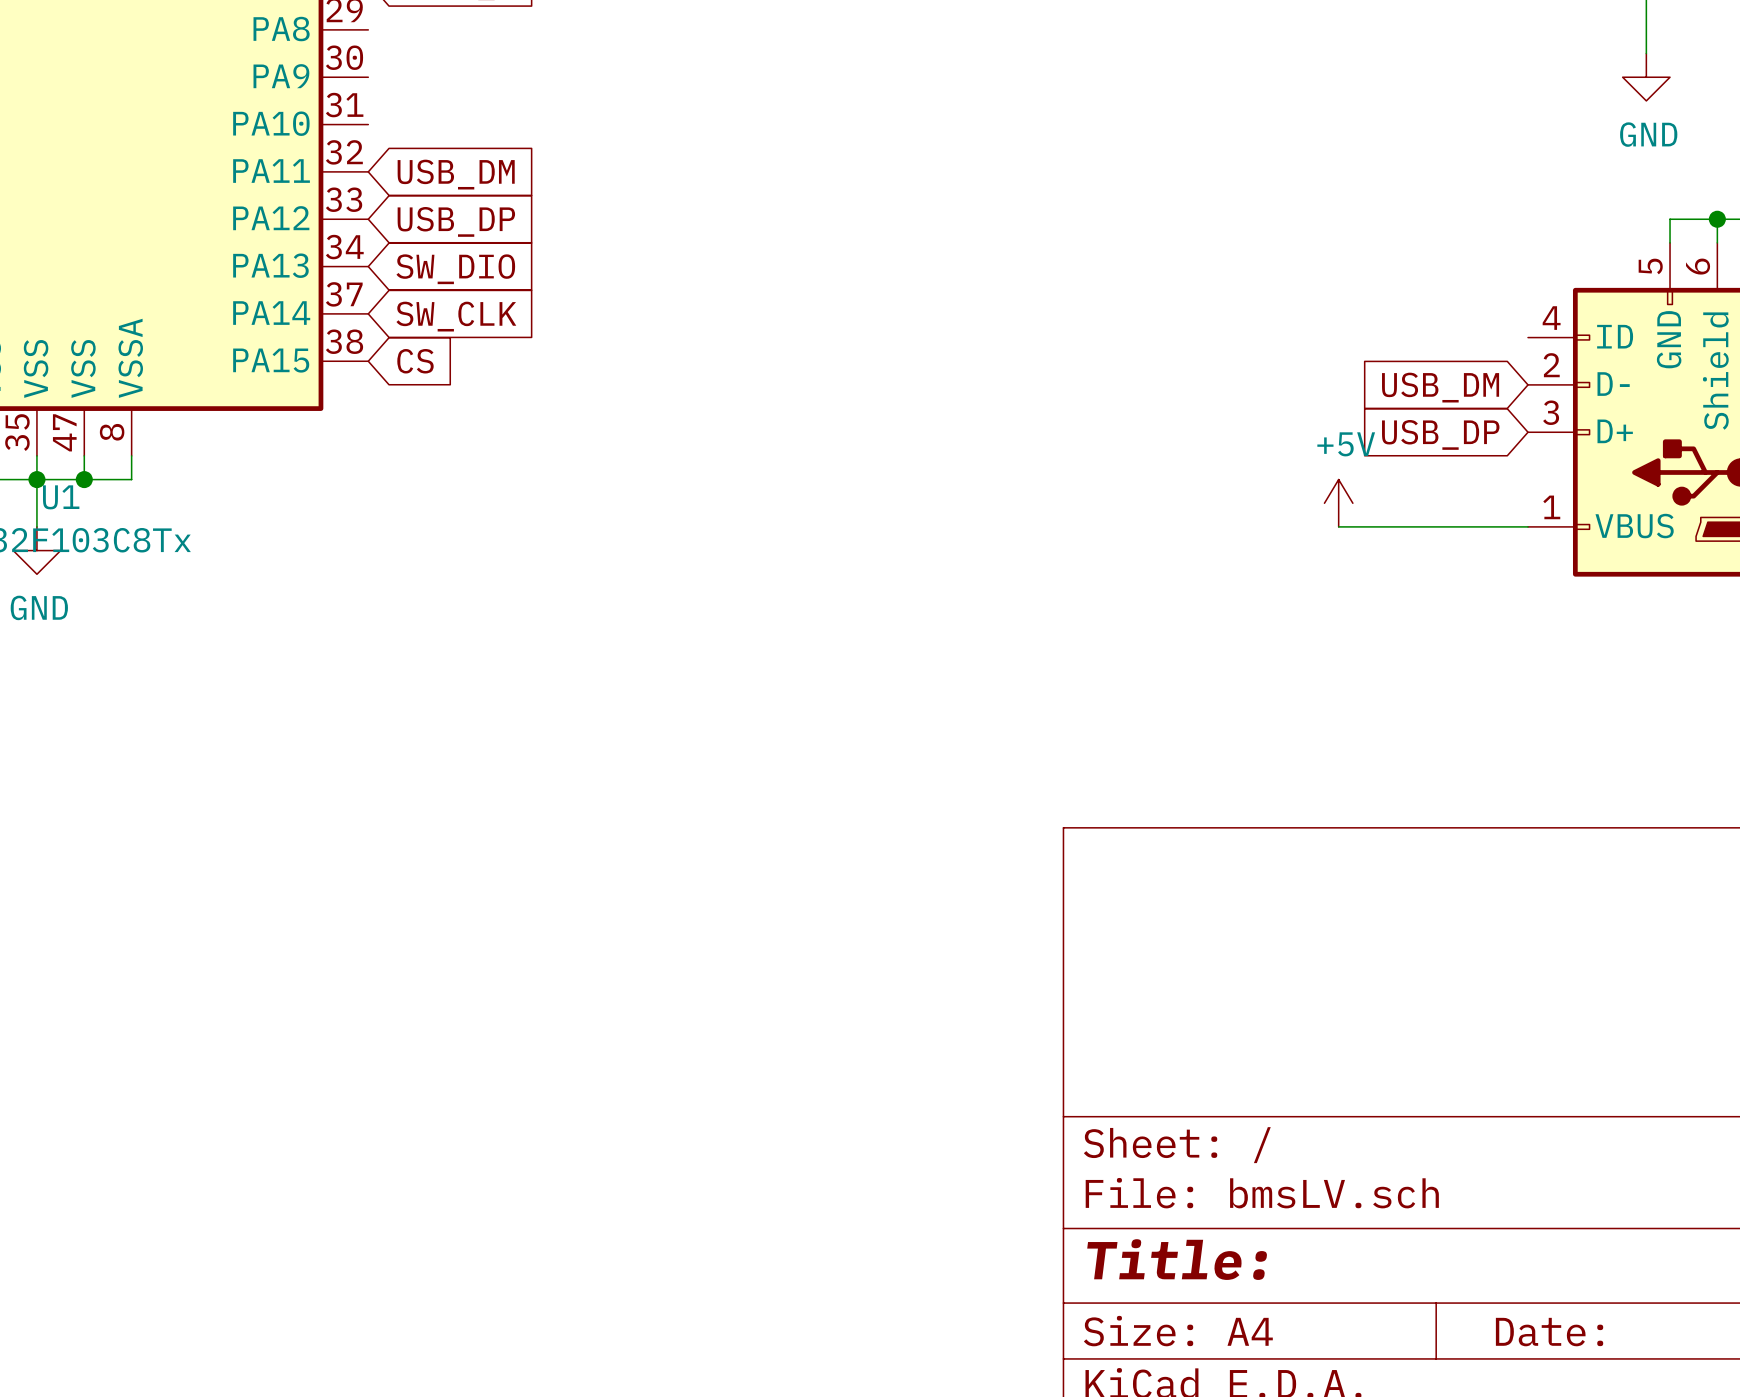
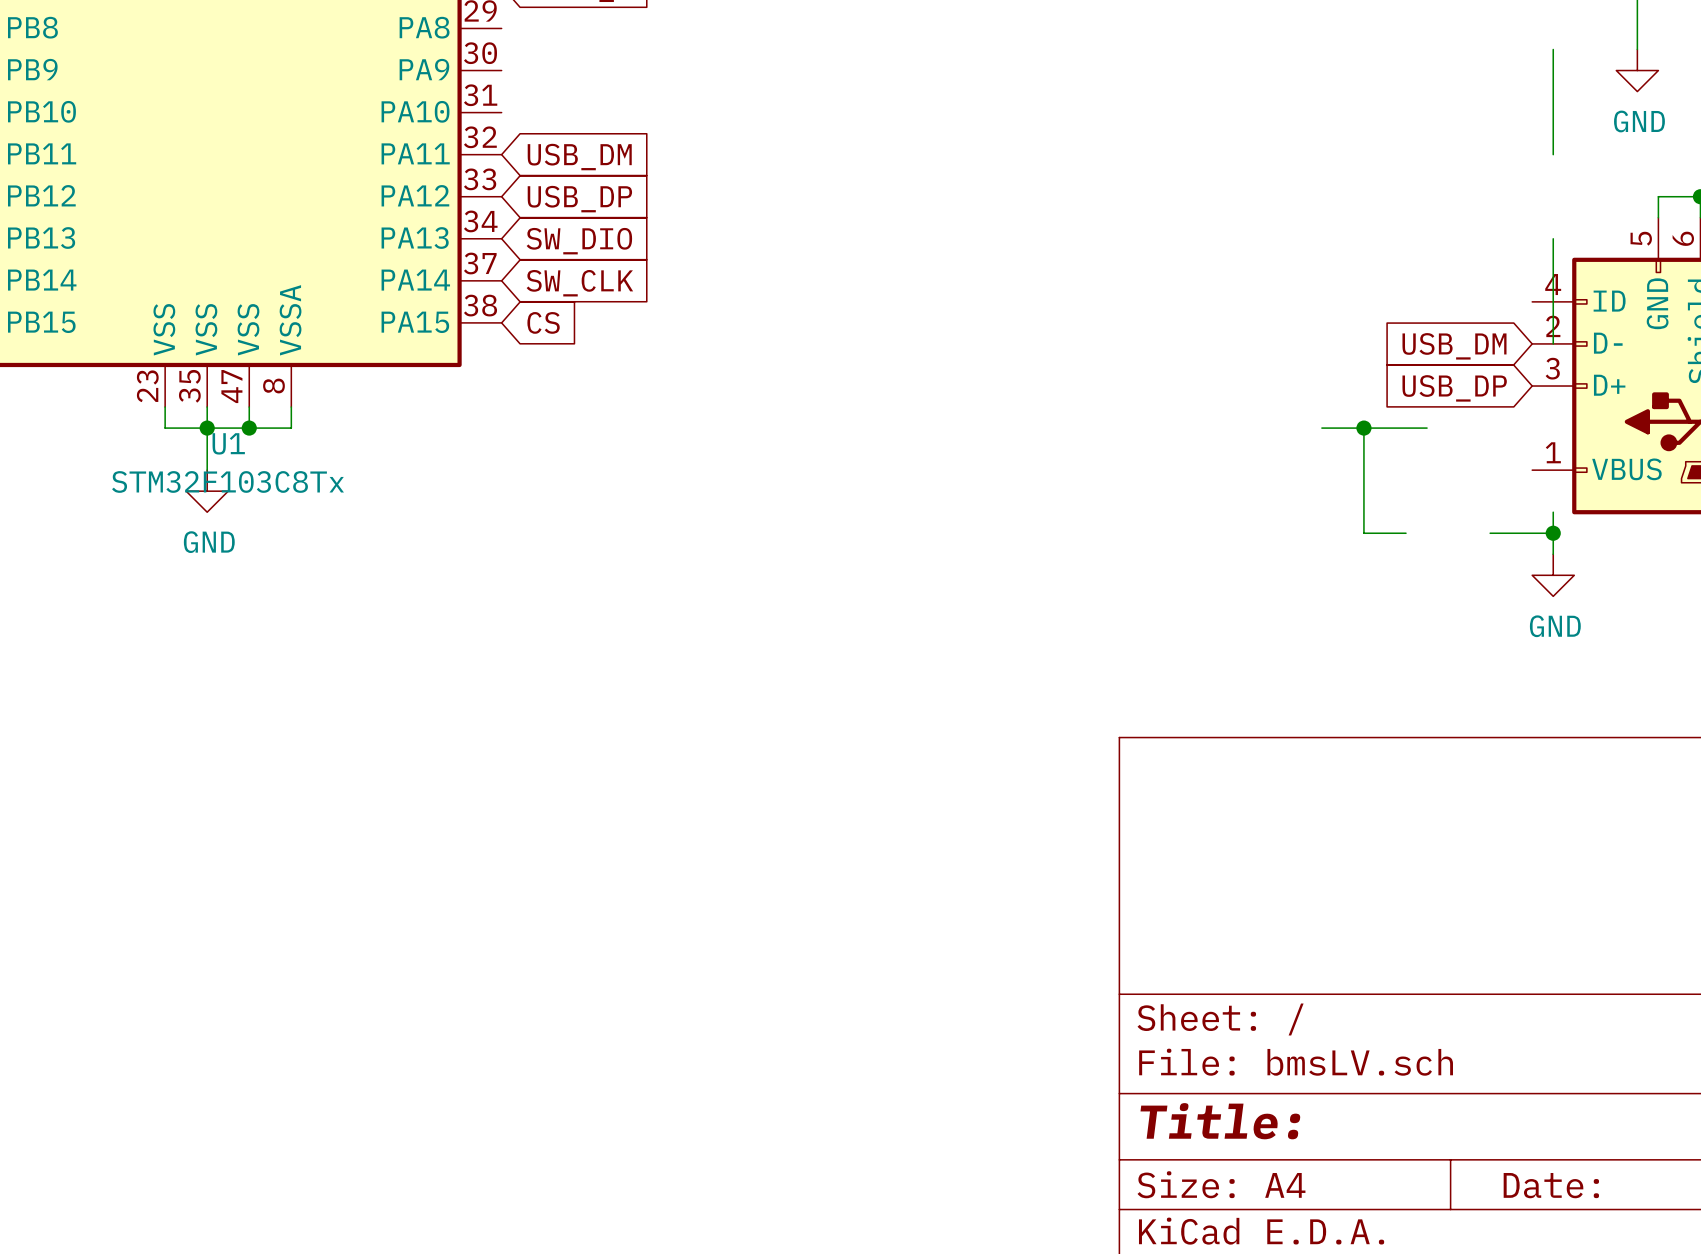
wire: none -> (1553, 49) (1553, 154)
wire: none -> (1553, 238) (1553, 343)
wire: none -> (1321, 428) (1427, 428)
wire: none -> (1363, 428) (1363, 533) (1406, 533)
junction: none -> (1363, 428)
power symbol: +5V (1338, 503) -> none
wire: (1338, 526) (1528, 526) -> none
wire: none -> (1553, 512) (1553, 554)
wire: none -> (1490, 533) (1553, 533)
junction: none -> (1553, 533)
power symbol: none -> GND (1553, 575)

